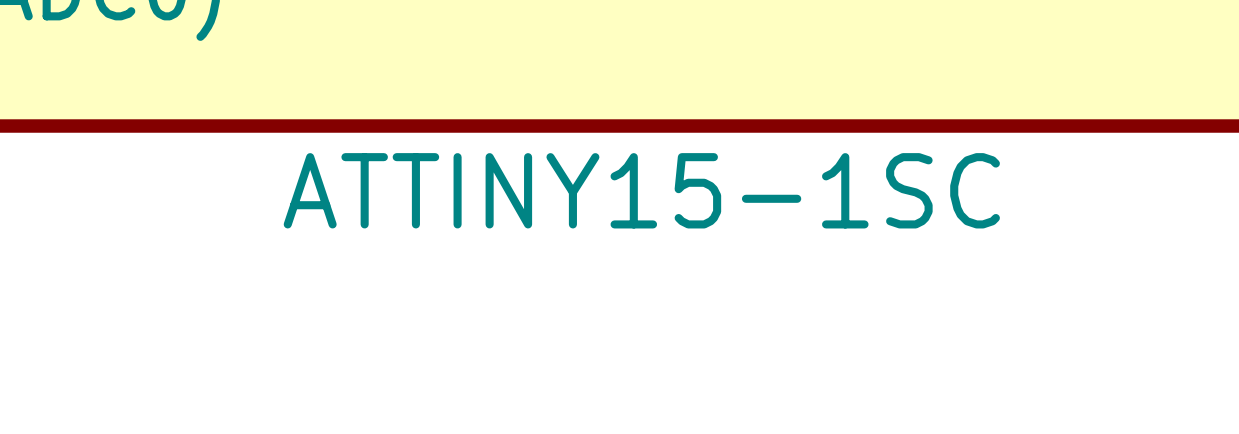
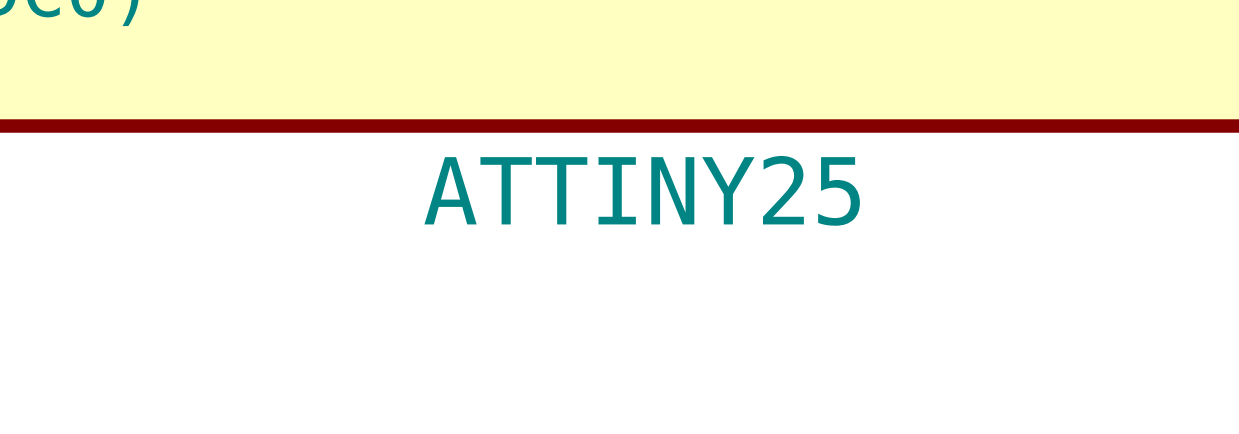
part value: ATTINY15-1SC (641, 190) -> ATTINY25 (642, 190)

